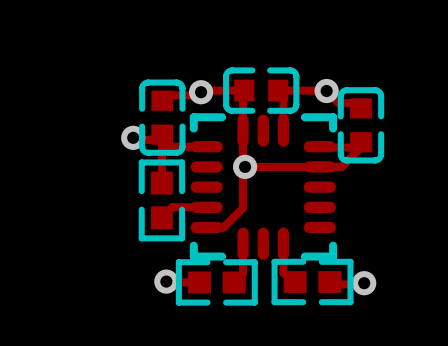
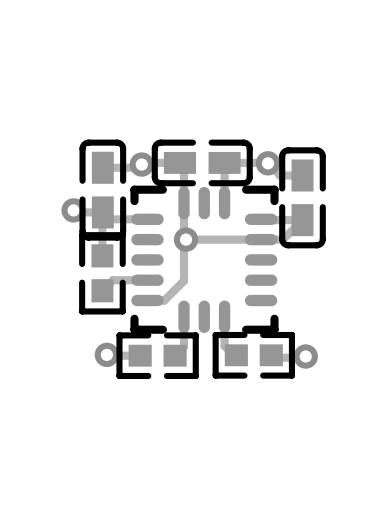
part footprint: [223, 67, 300, 114] -> [151, 139, 253, 187]
part footprint: [139, 79, 186, 156] -> [79, 139, 127, 241]
part footprint: [337, 87, 385, 164] -> [279, 147, 326, 249]

